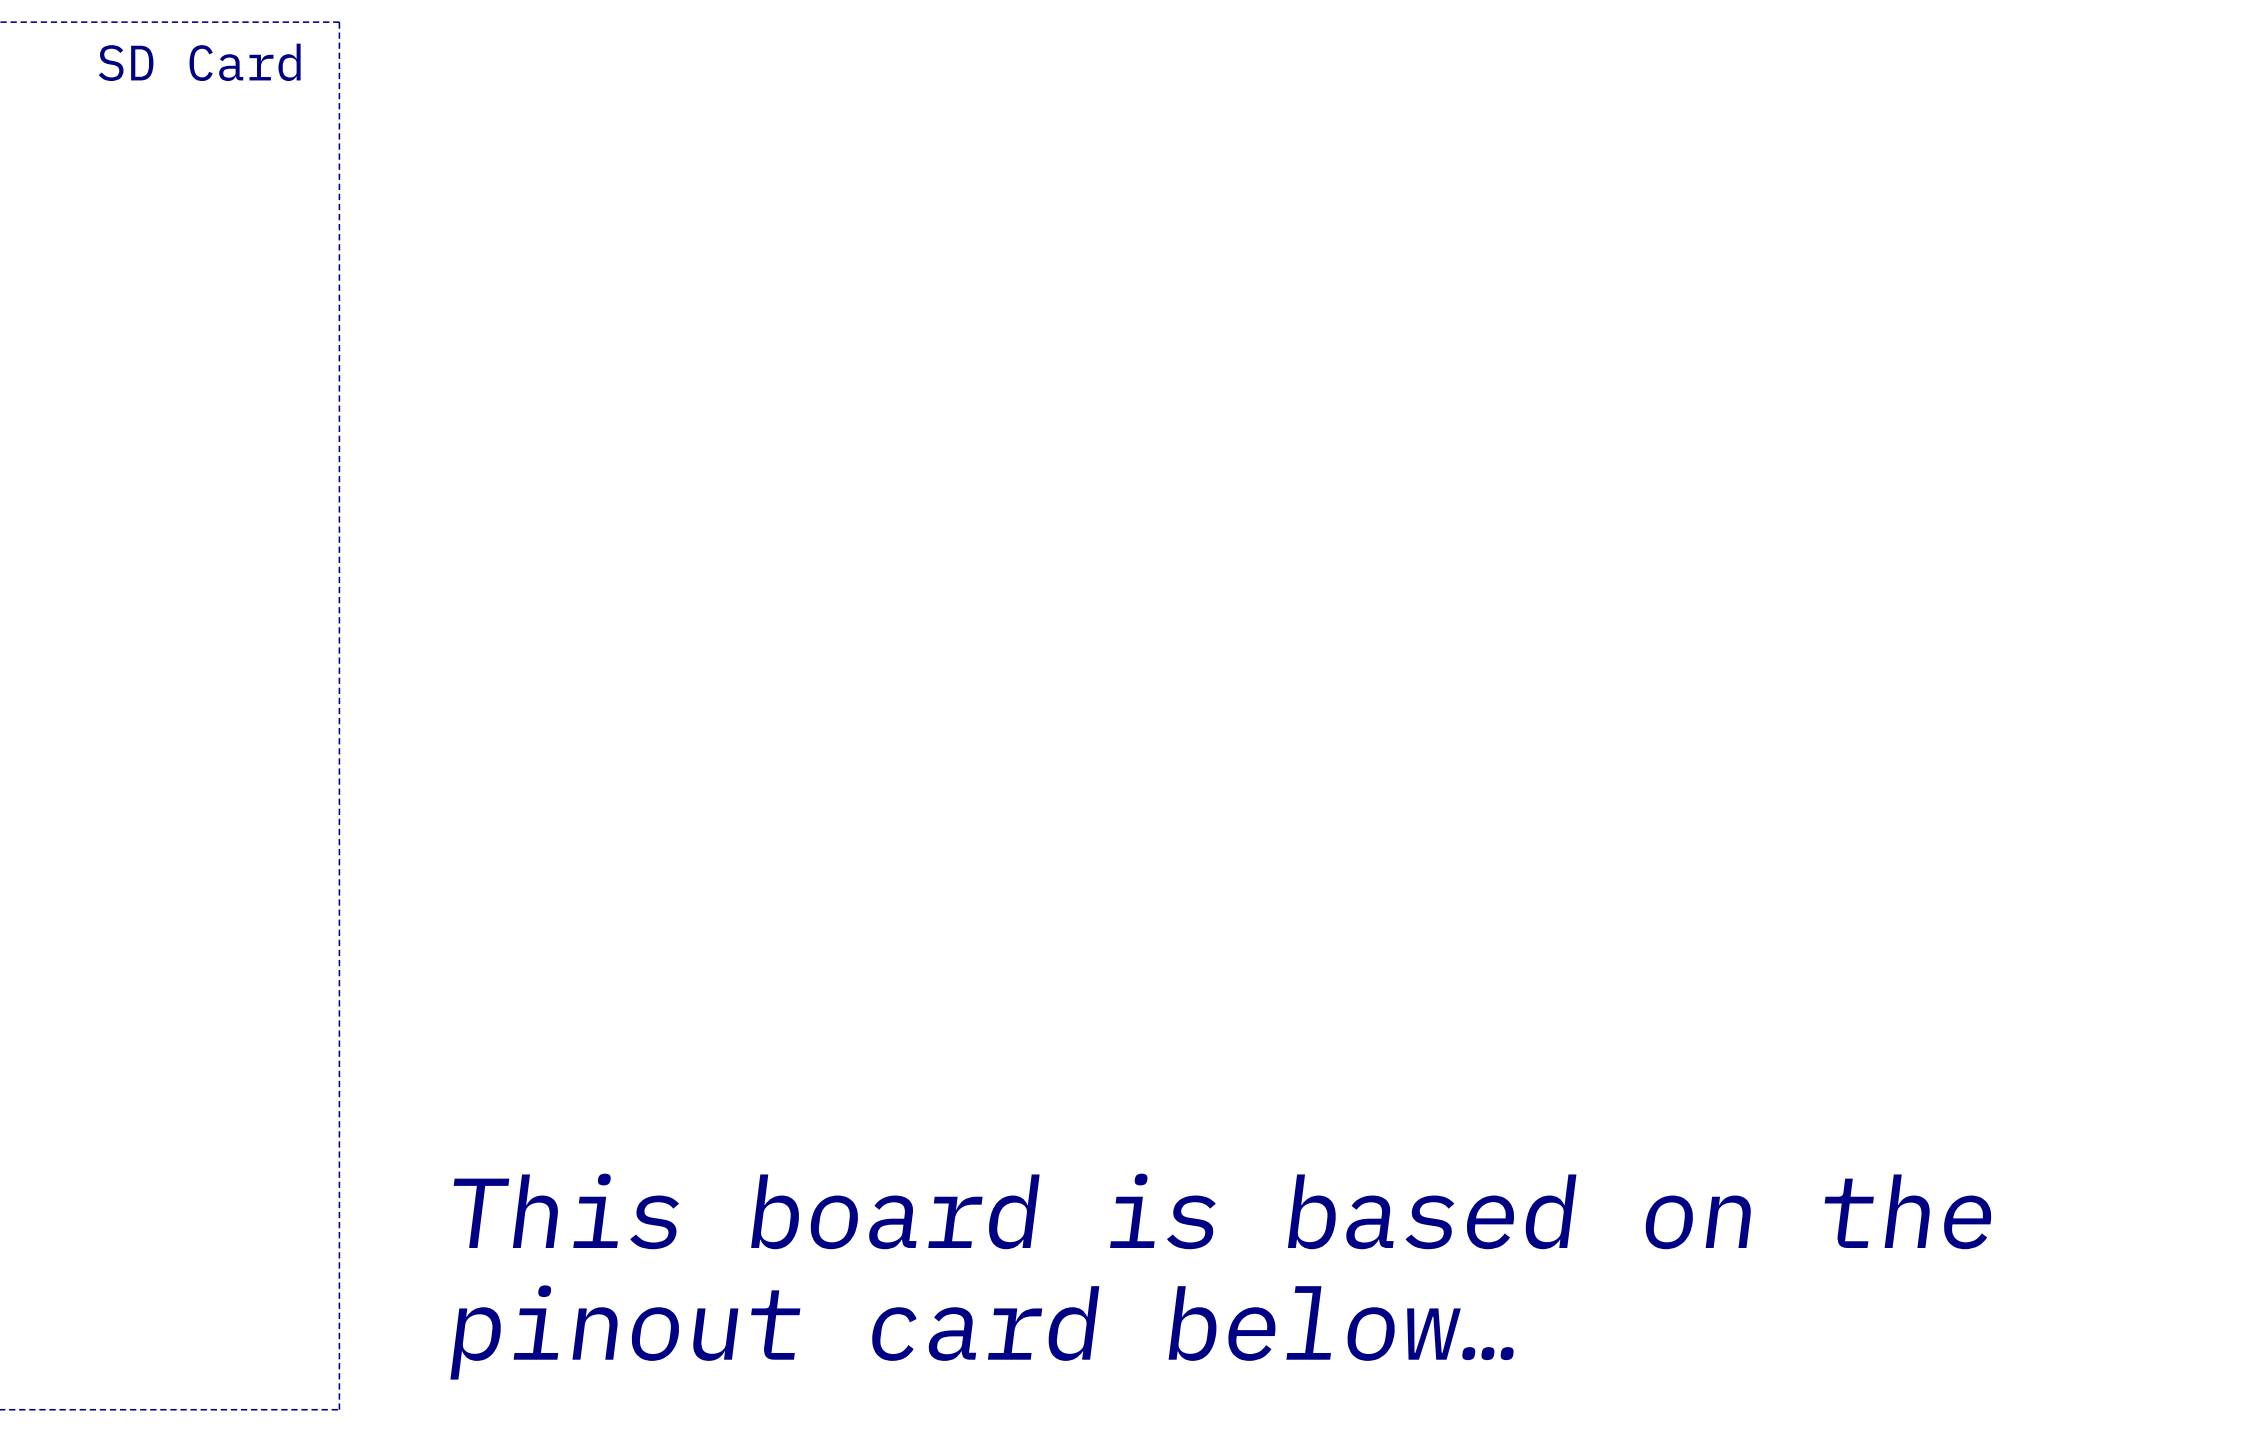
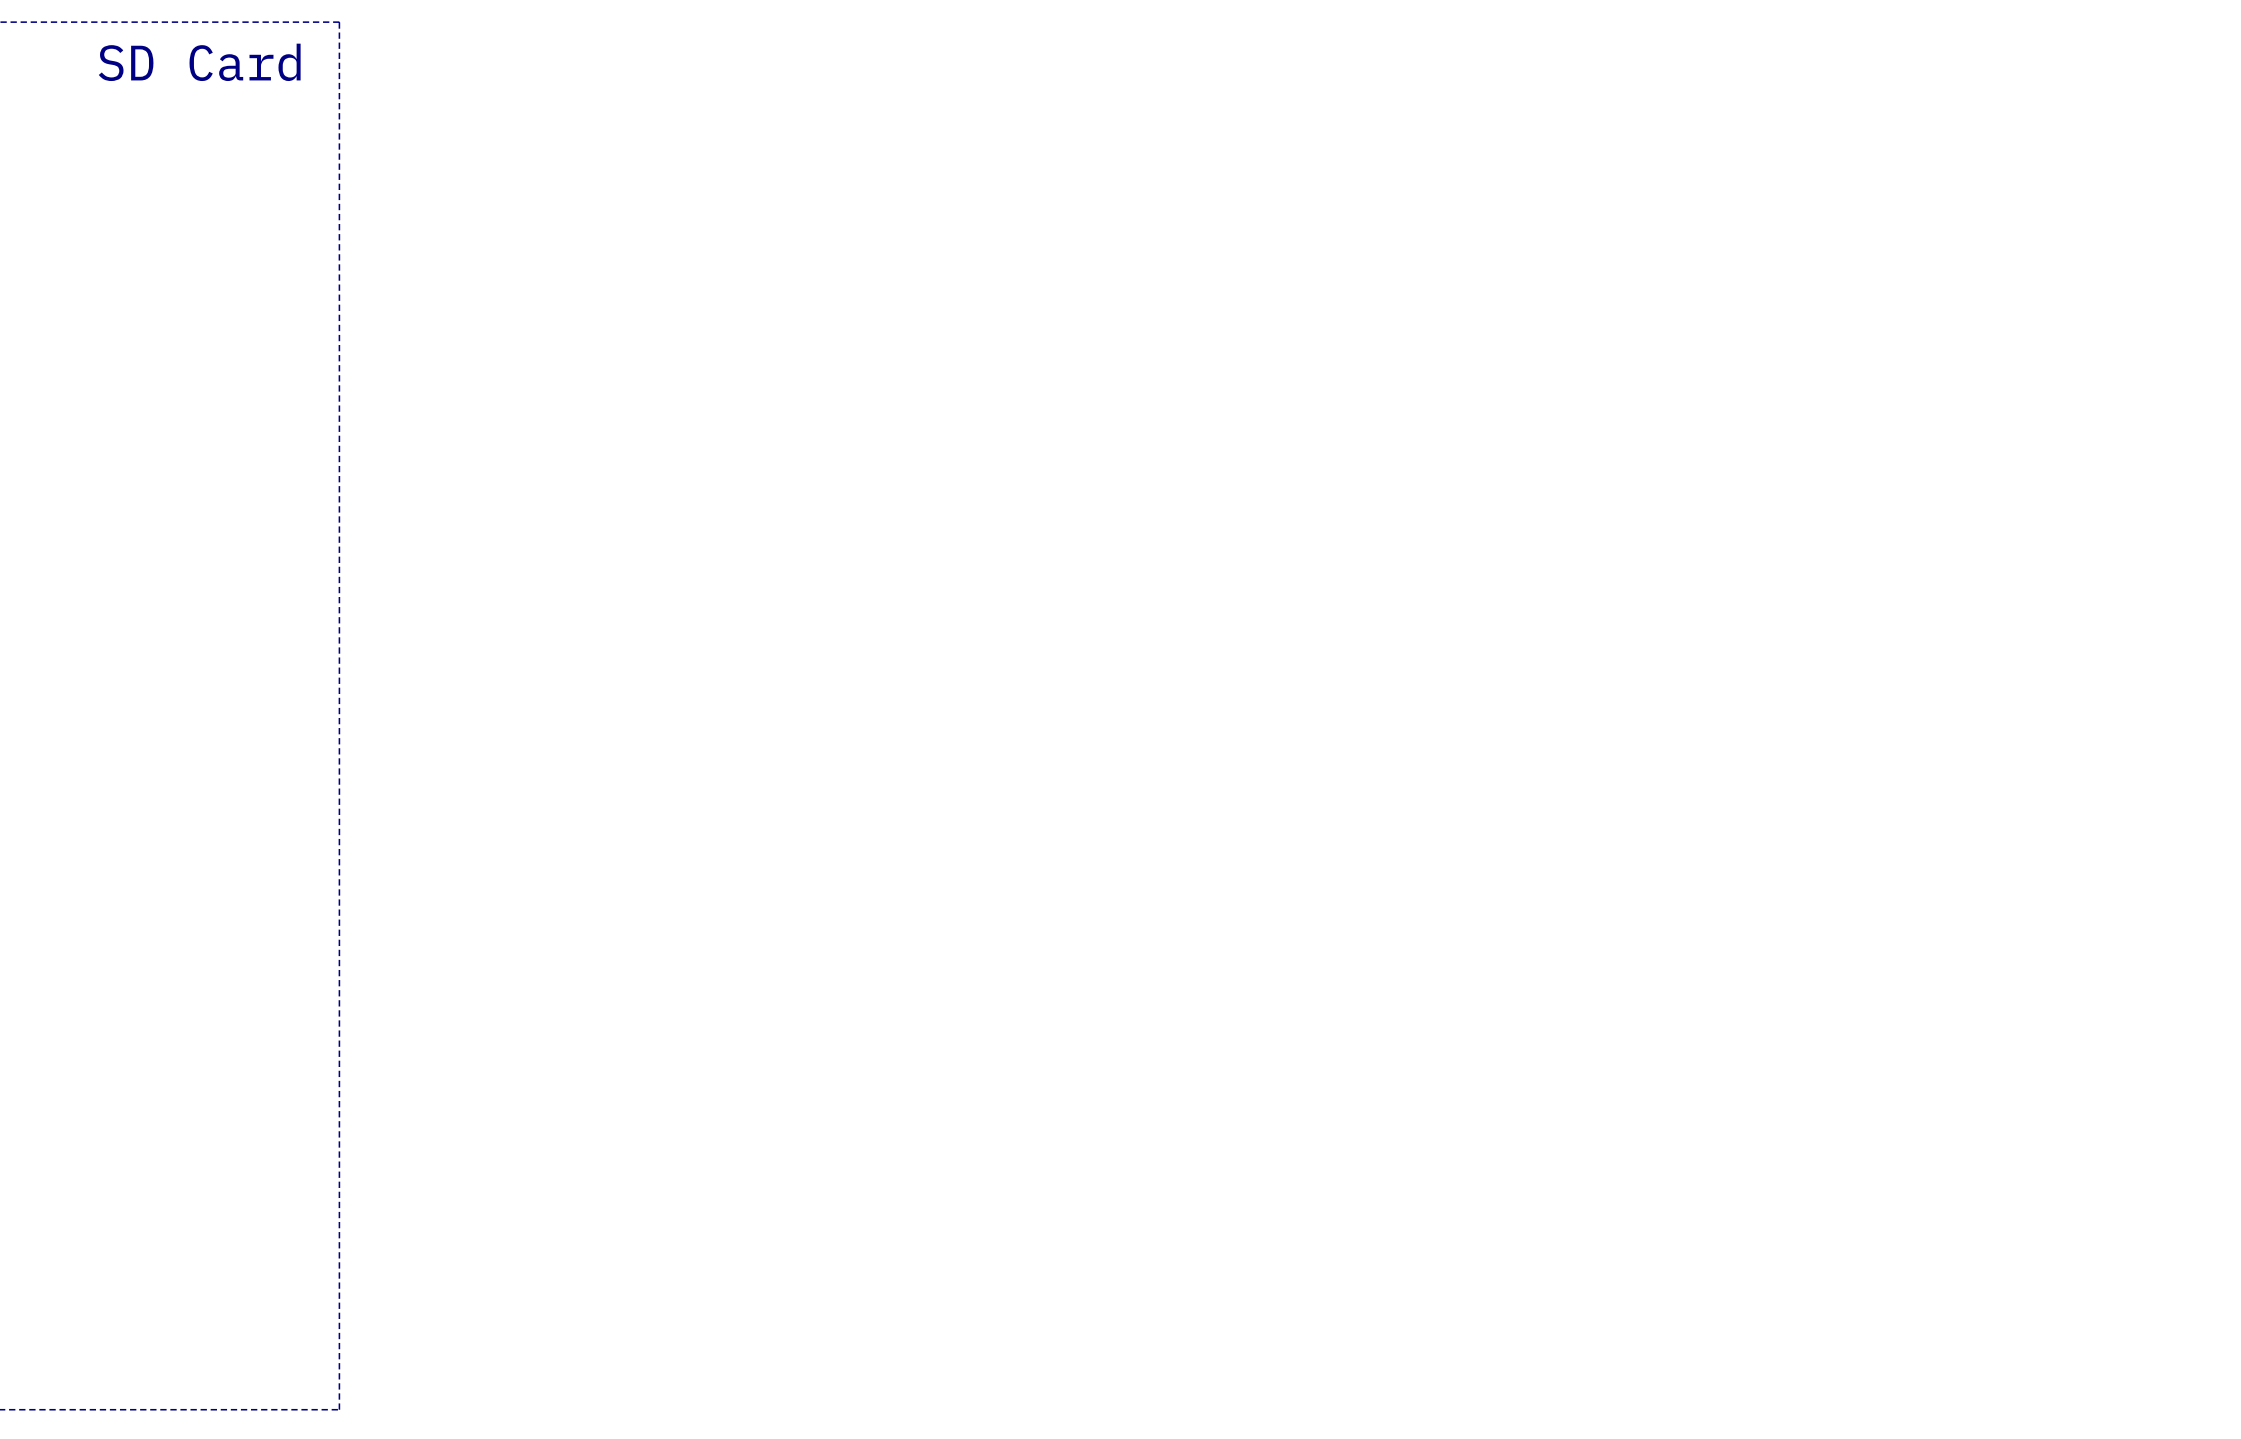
text: This board is based on the (1222, 1211) -> none
text: pinout card below… (982, 1332) -> none

